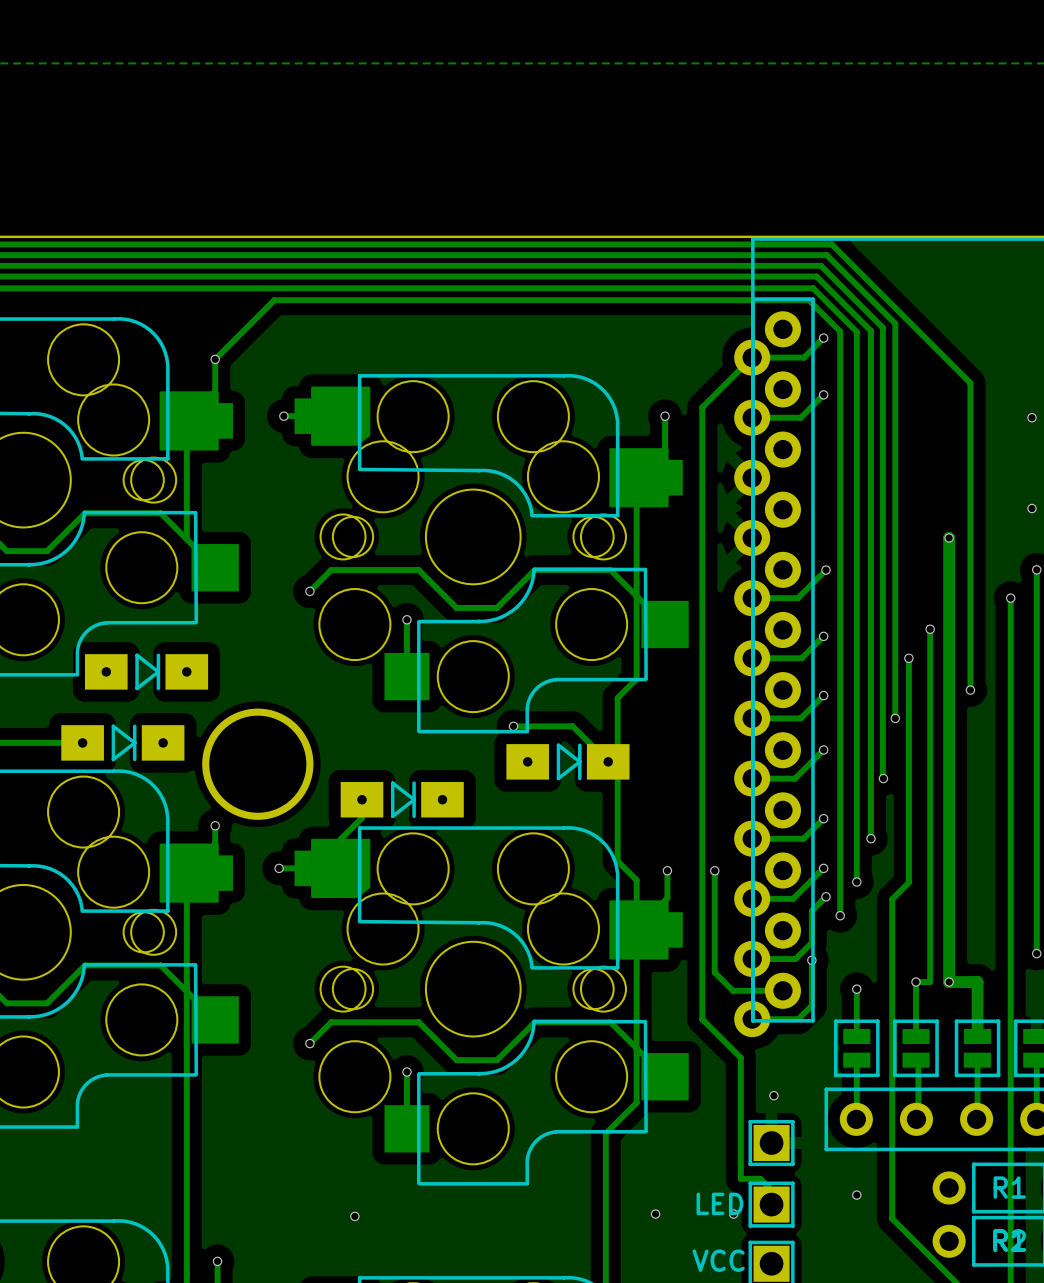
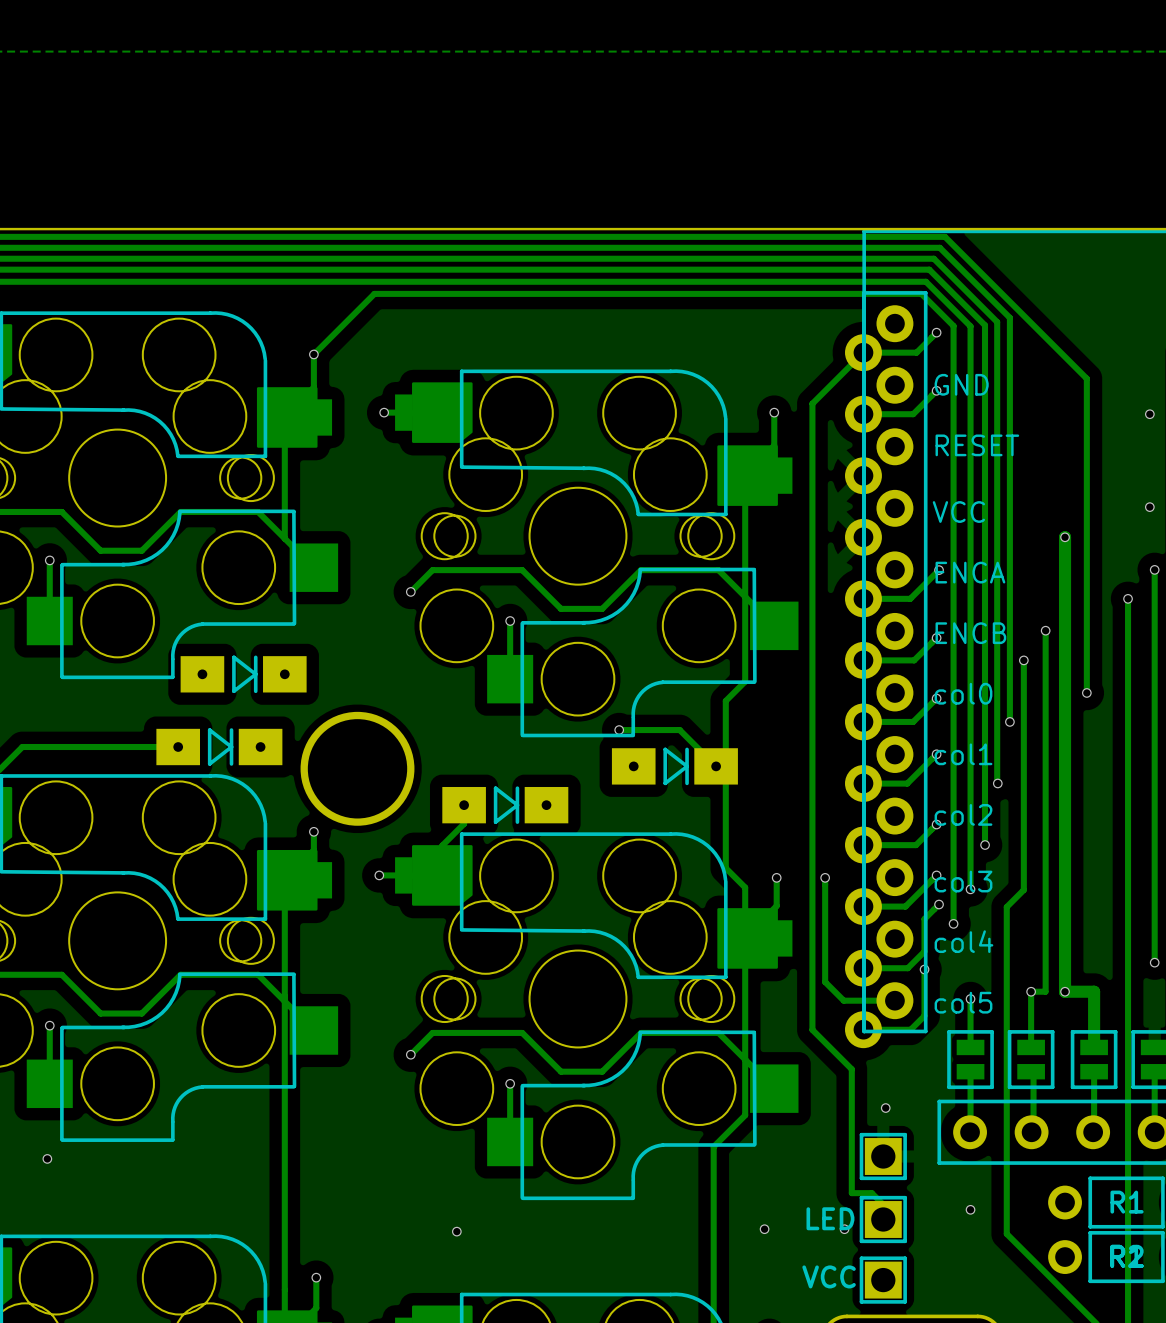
text: none -> GND (961, 384)
text: none -> RESET (977, 445)
text: none -> VCC (958, 512)
text: none -> ENCA (970, 572)
text: none -> ENCB (970, 633)
text: none -> col0 (963, 693)
text: none -> col1 (963, 754)
text: none -> col2 (963, 814)
text: none -> col3 (963, 881)
text: none -> col4 (963, 941)
text: none -> col5 (963, 1002)

